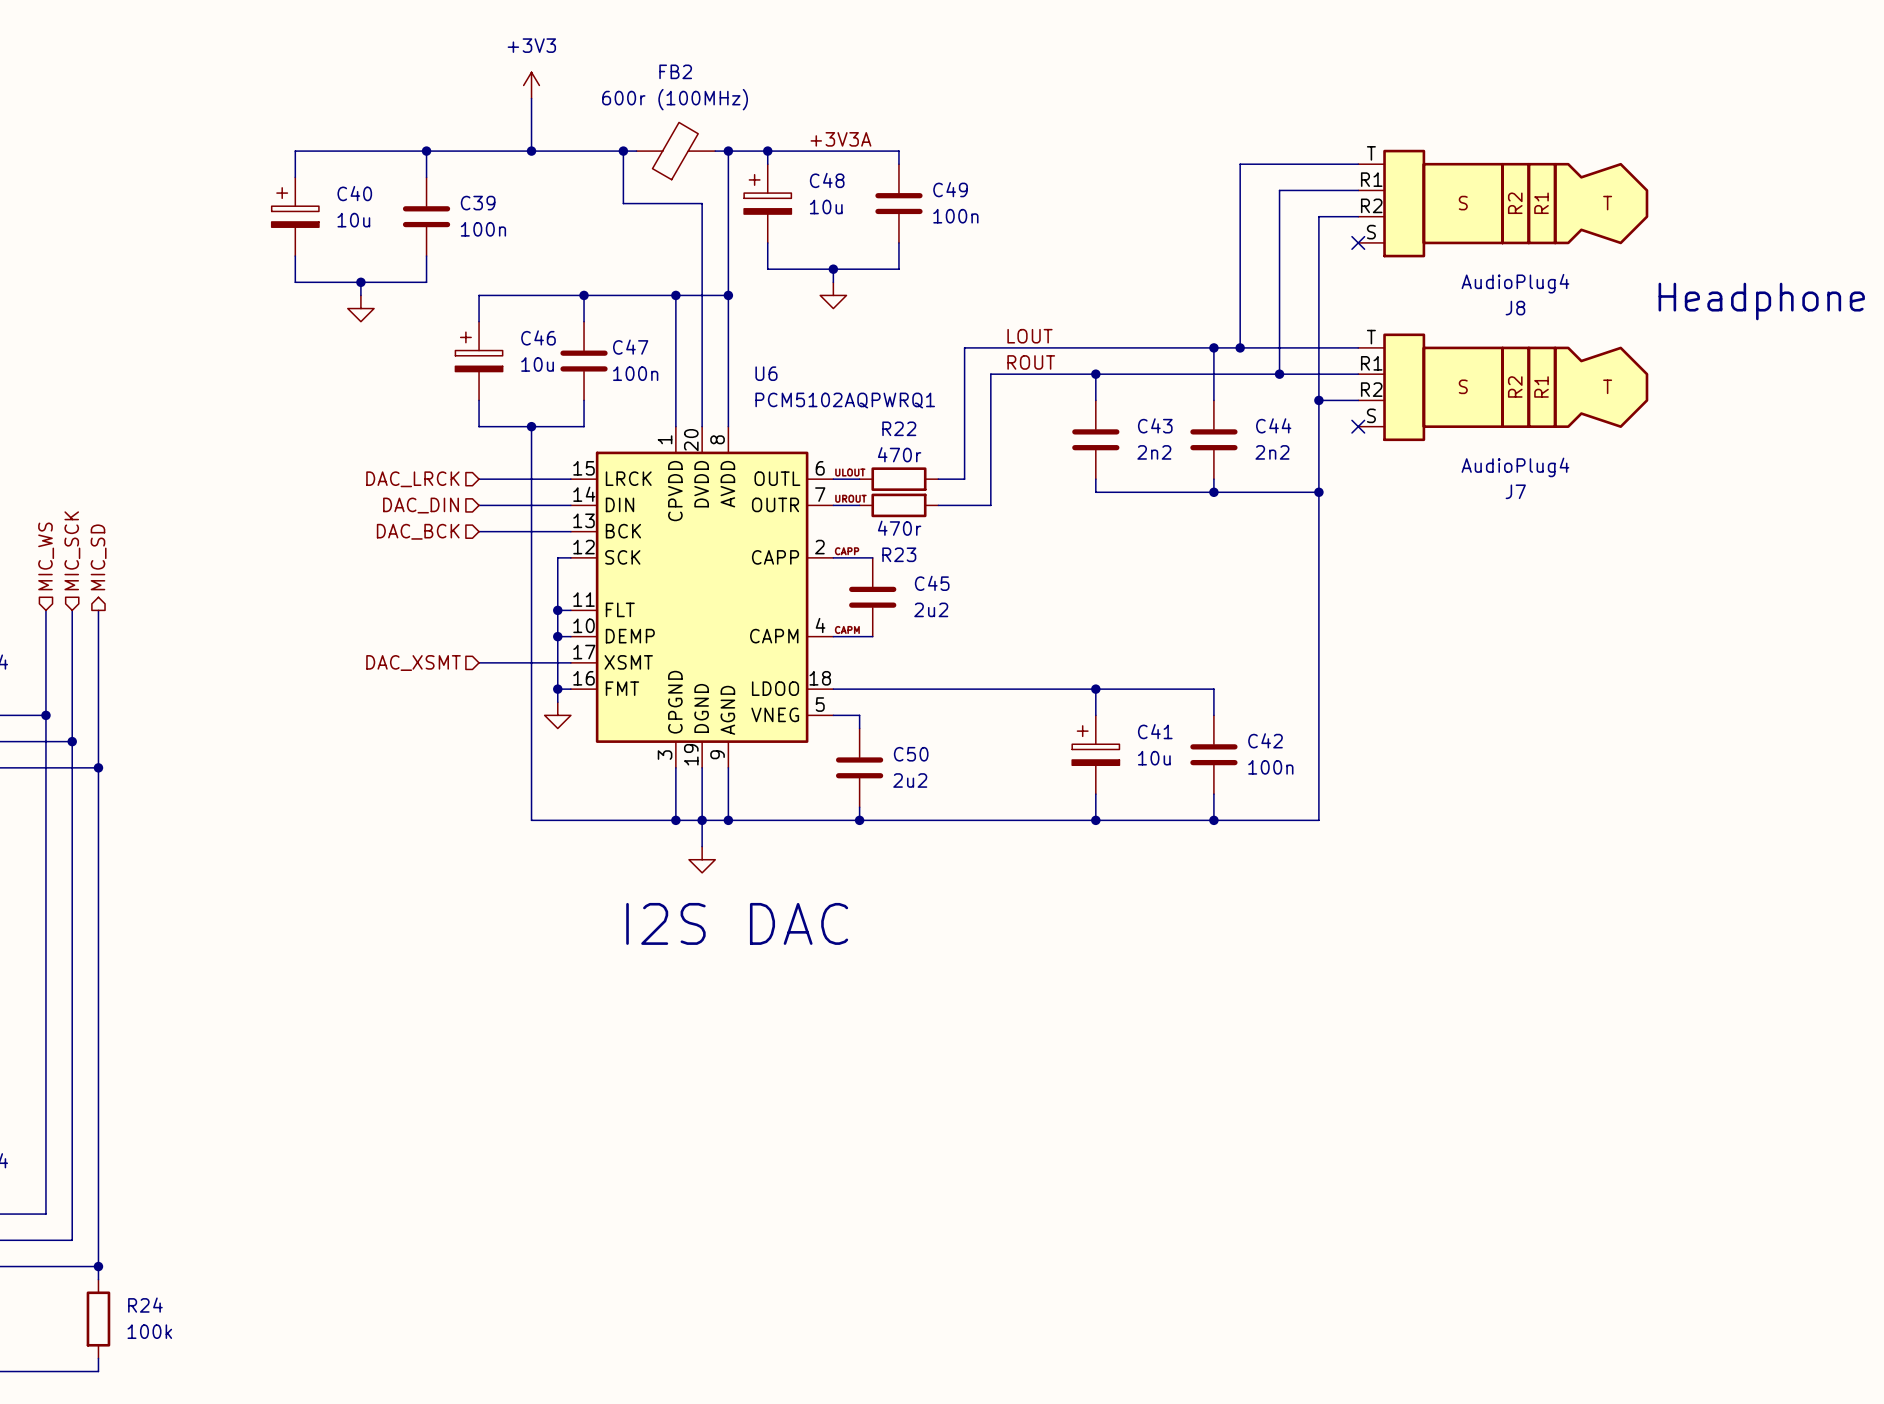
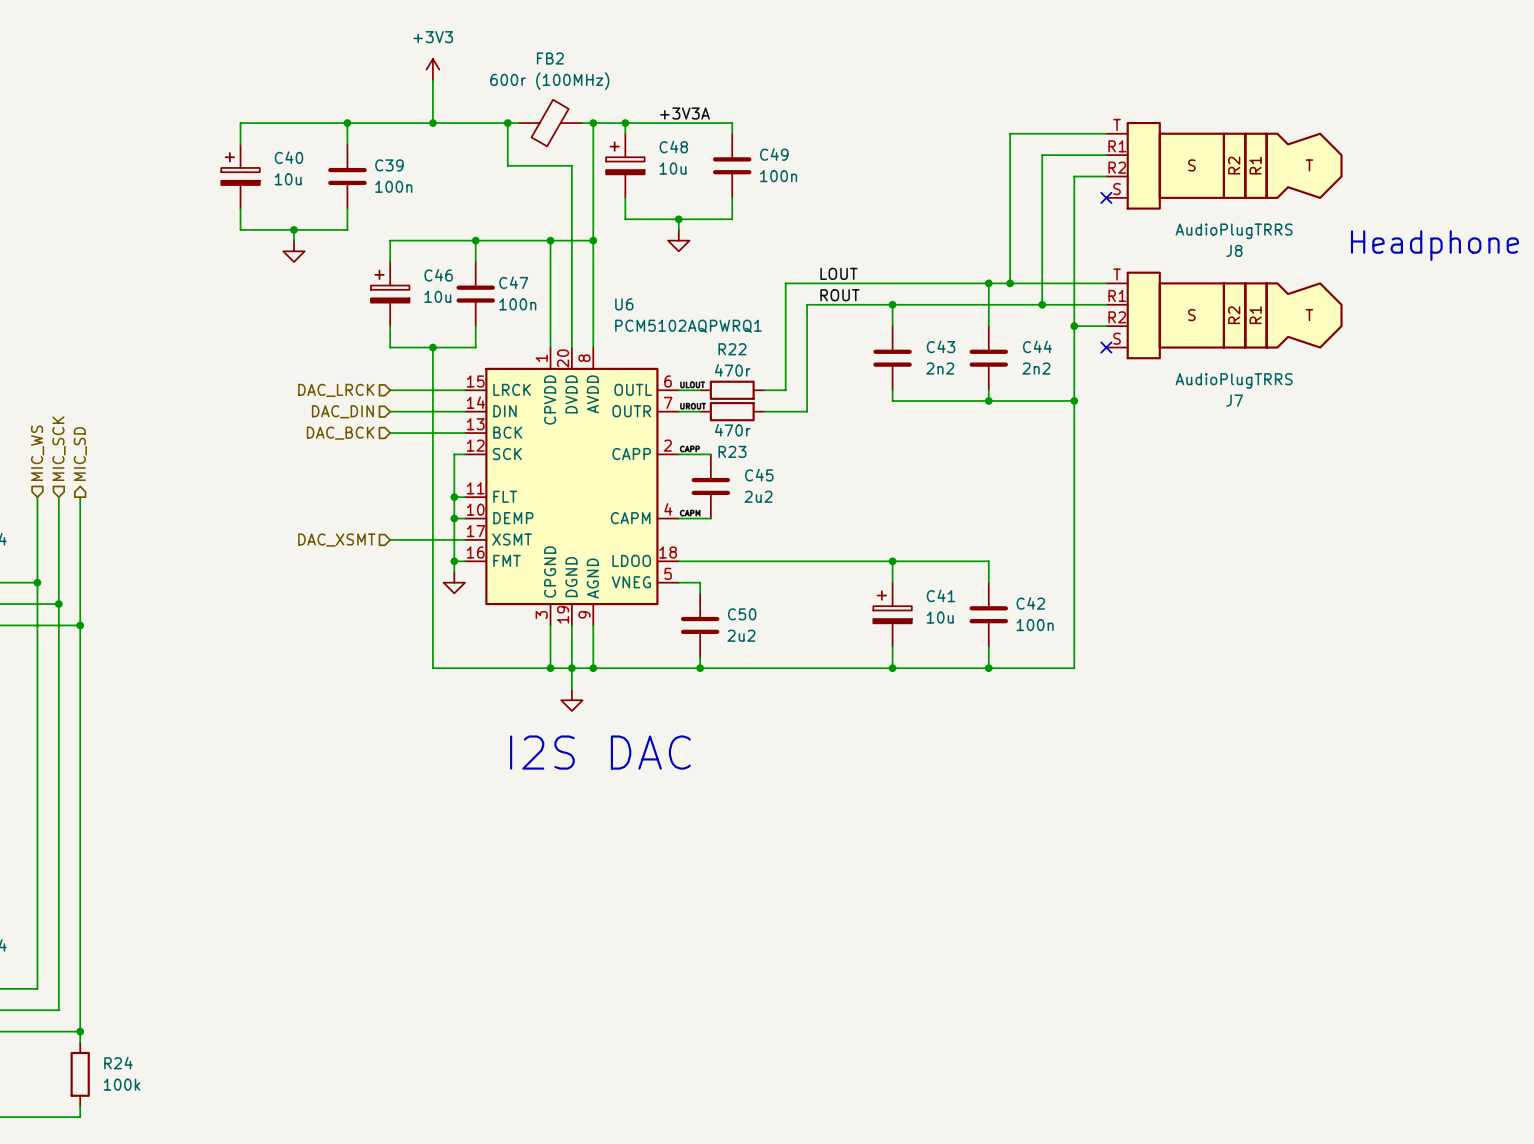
J8 value: AudioPlug4 (1515, 283) -> AudioPlugTRRS (1234, 231)
J7 value: AudioPlug4 (1515, 467) -> AudioPlugTRRS (1234, 380)

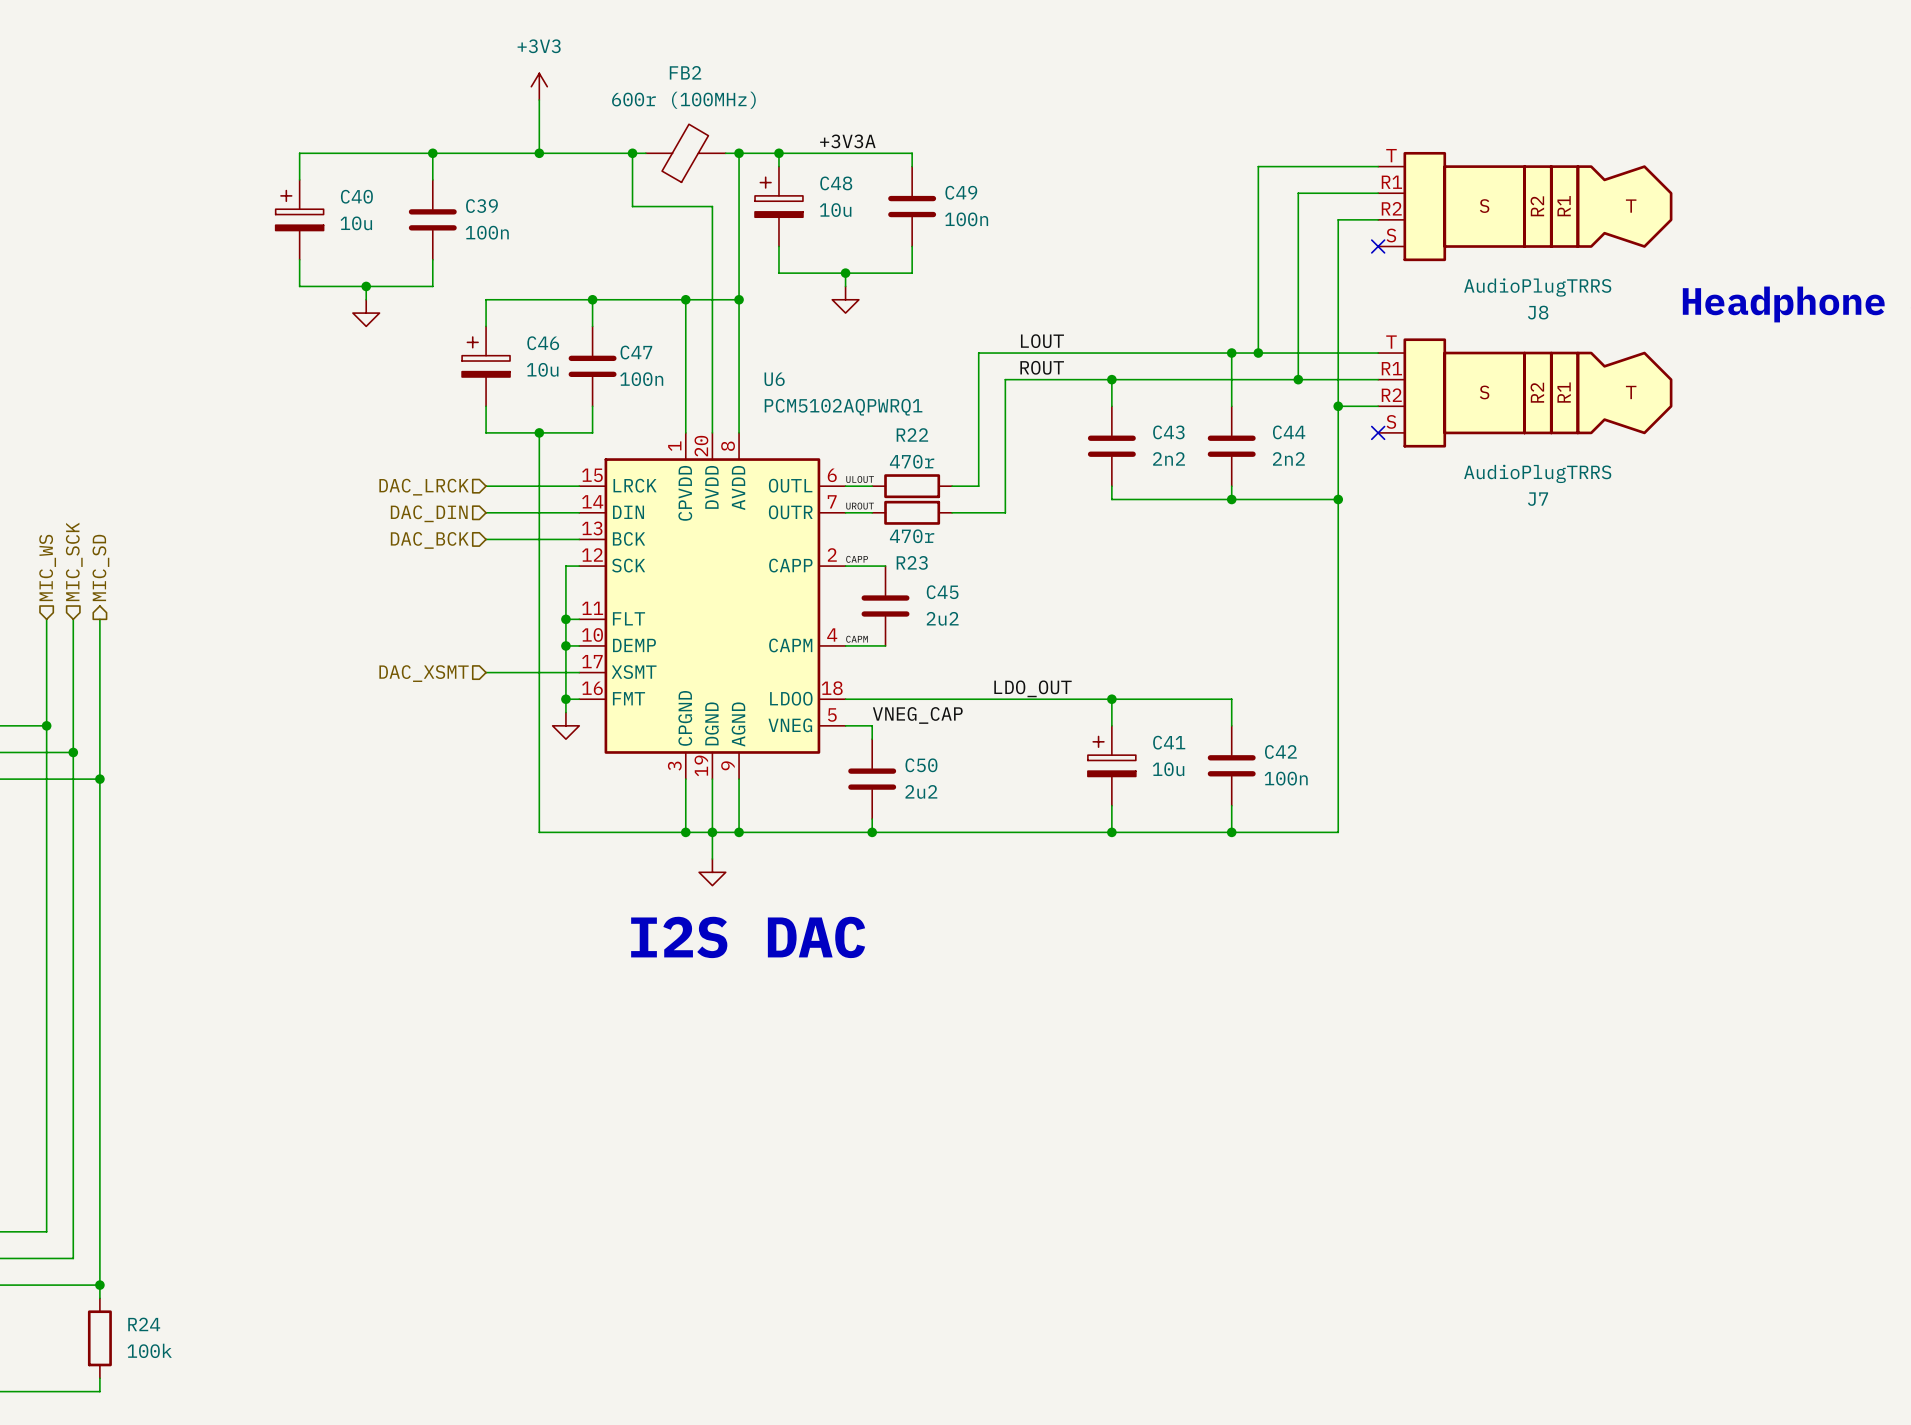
label: none -> LDO_OUT (1033, 688)
label: none -> VNEG_CAP (917, 715)

